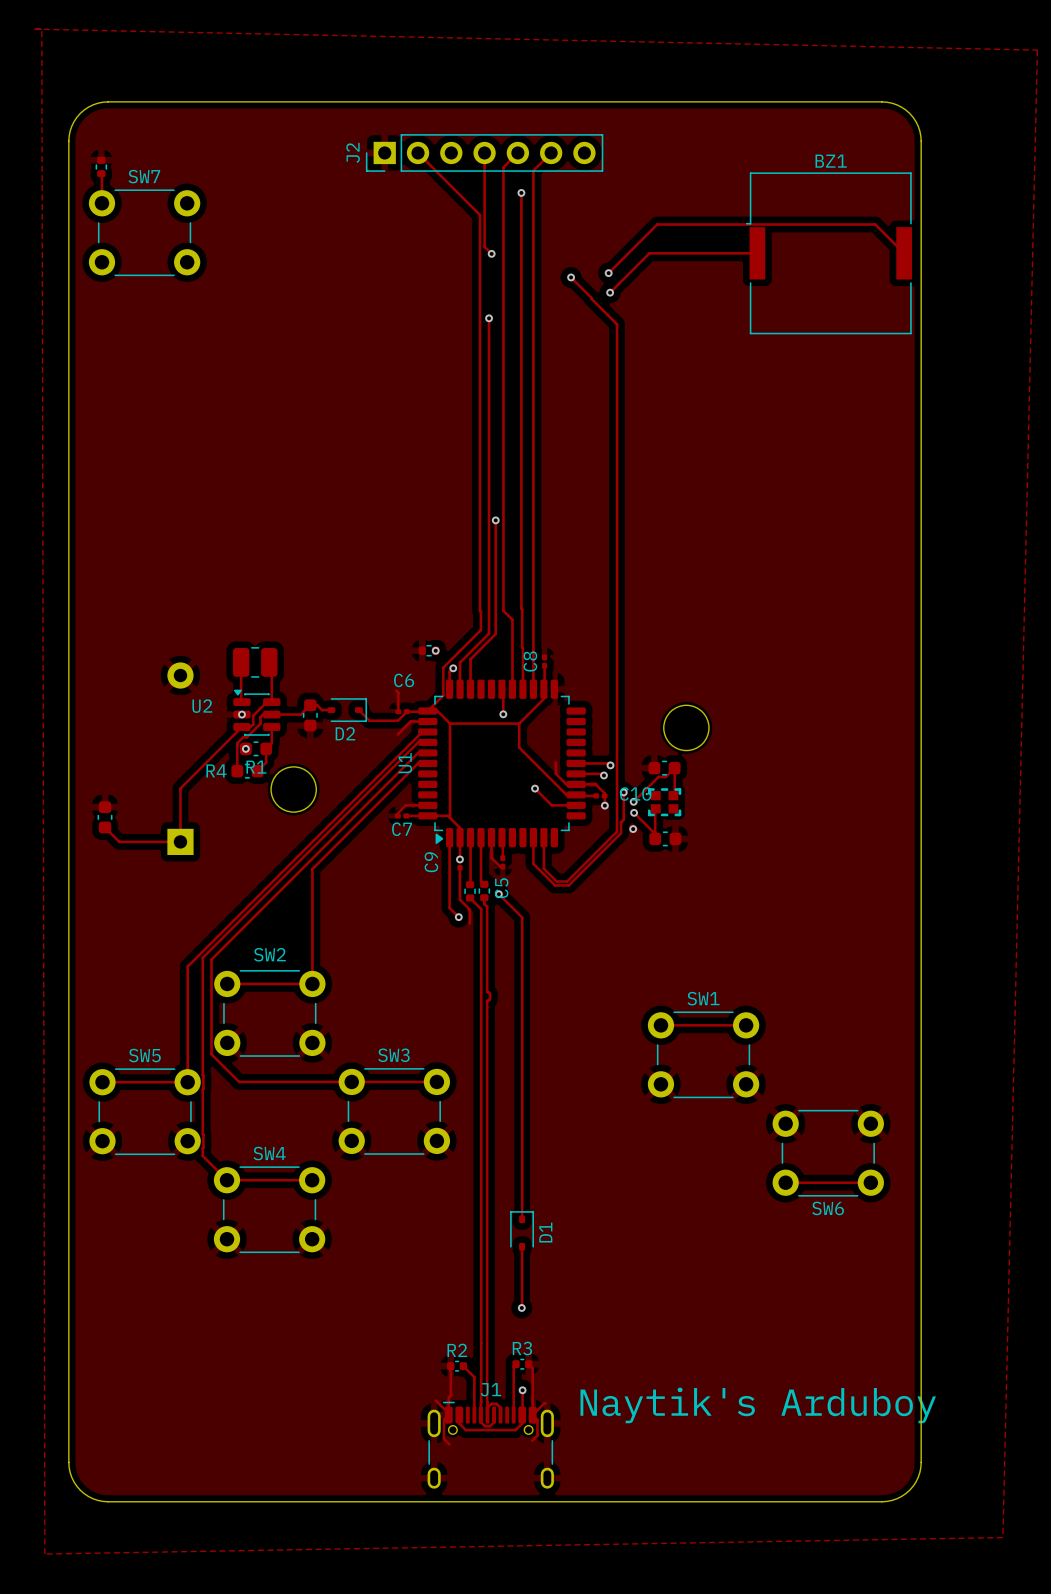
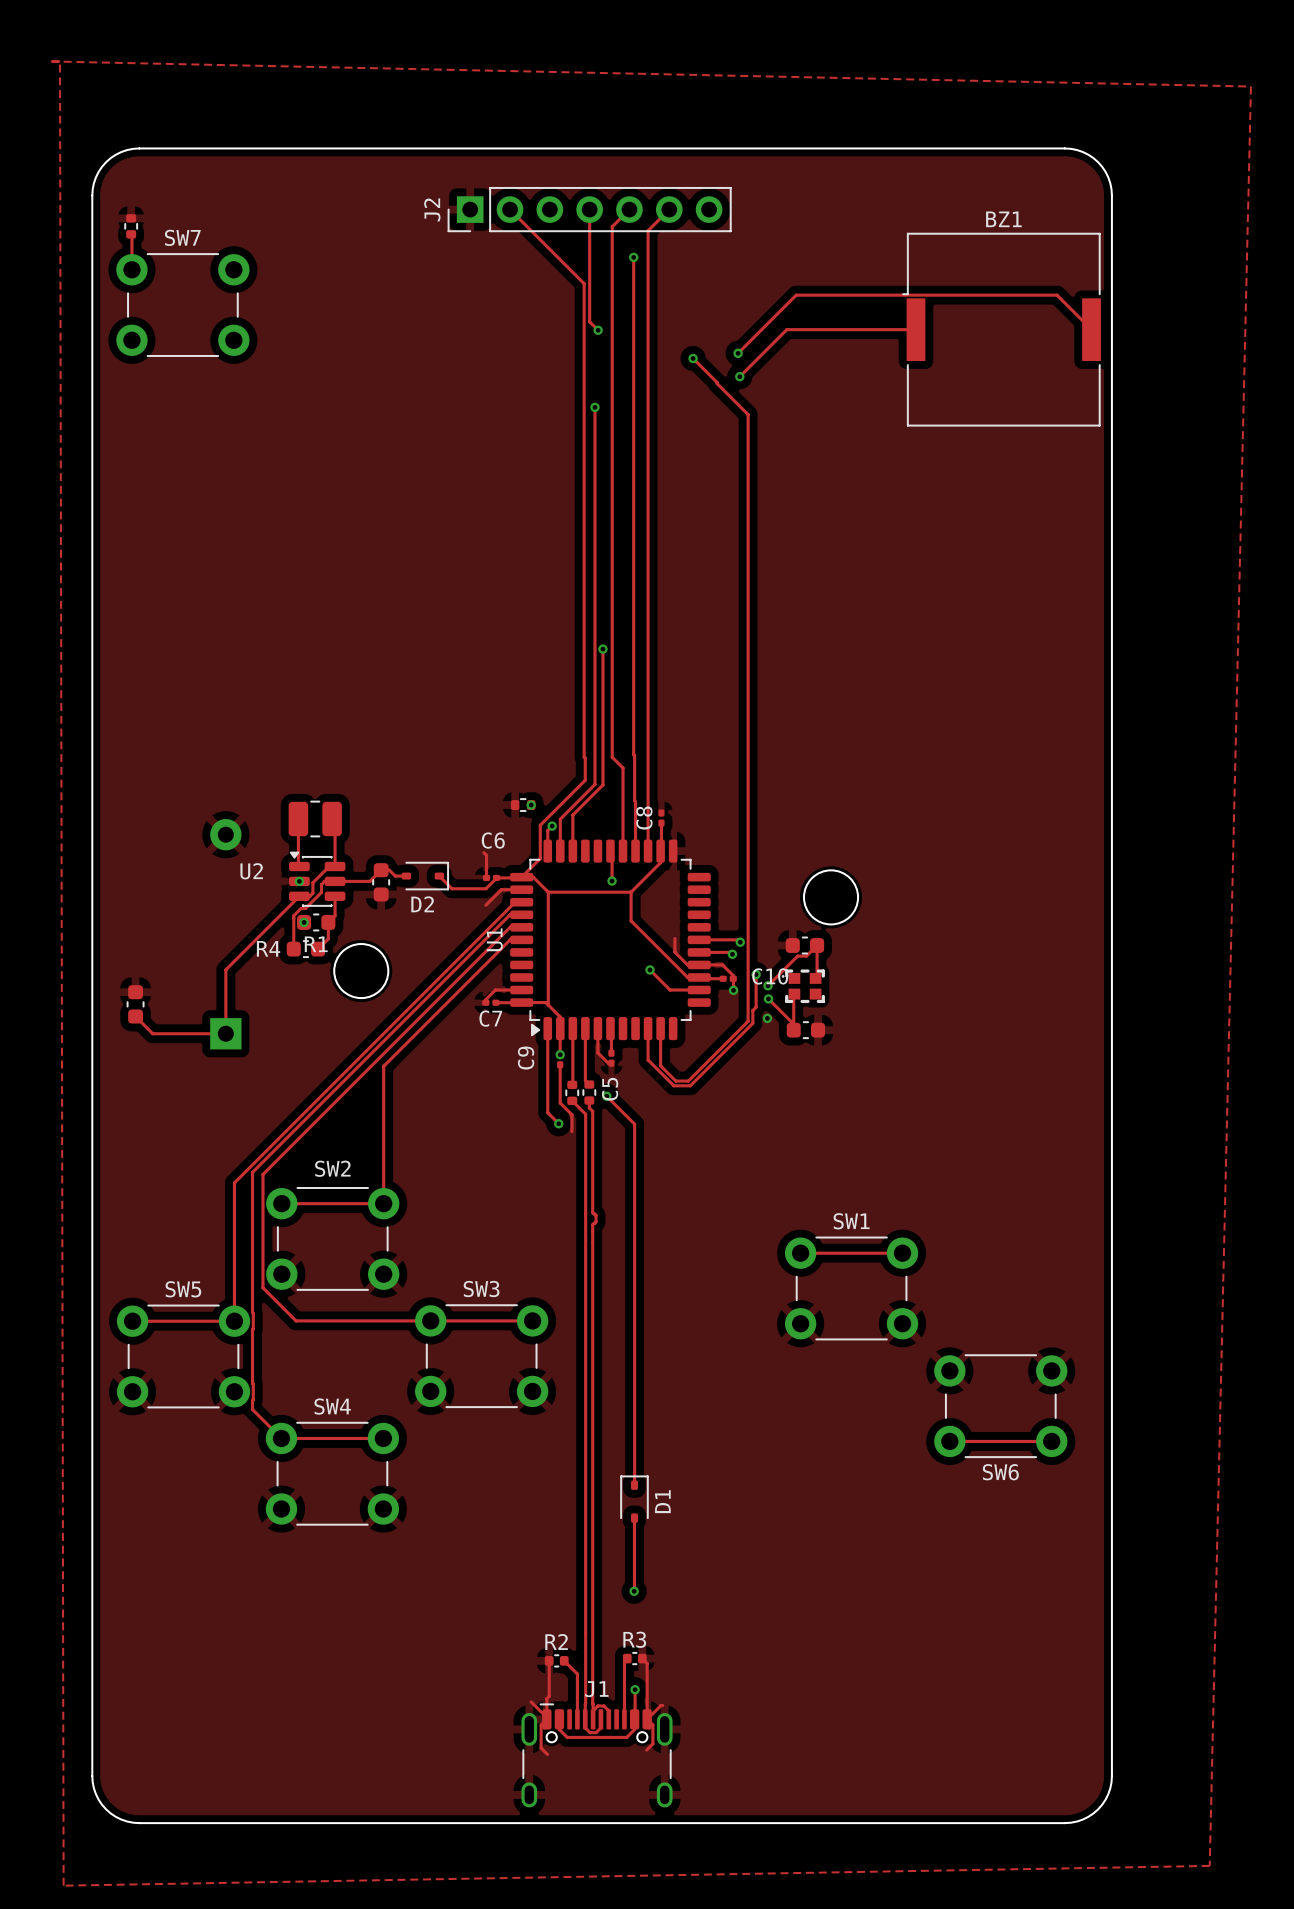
text: Naytik's Arduboy (758, 1405) -> none

